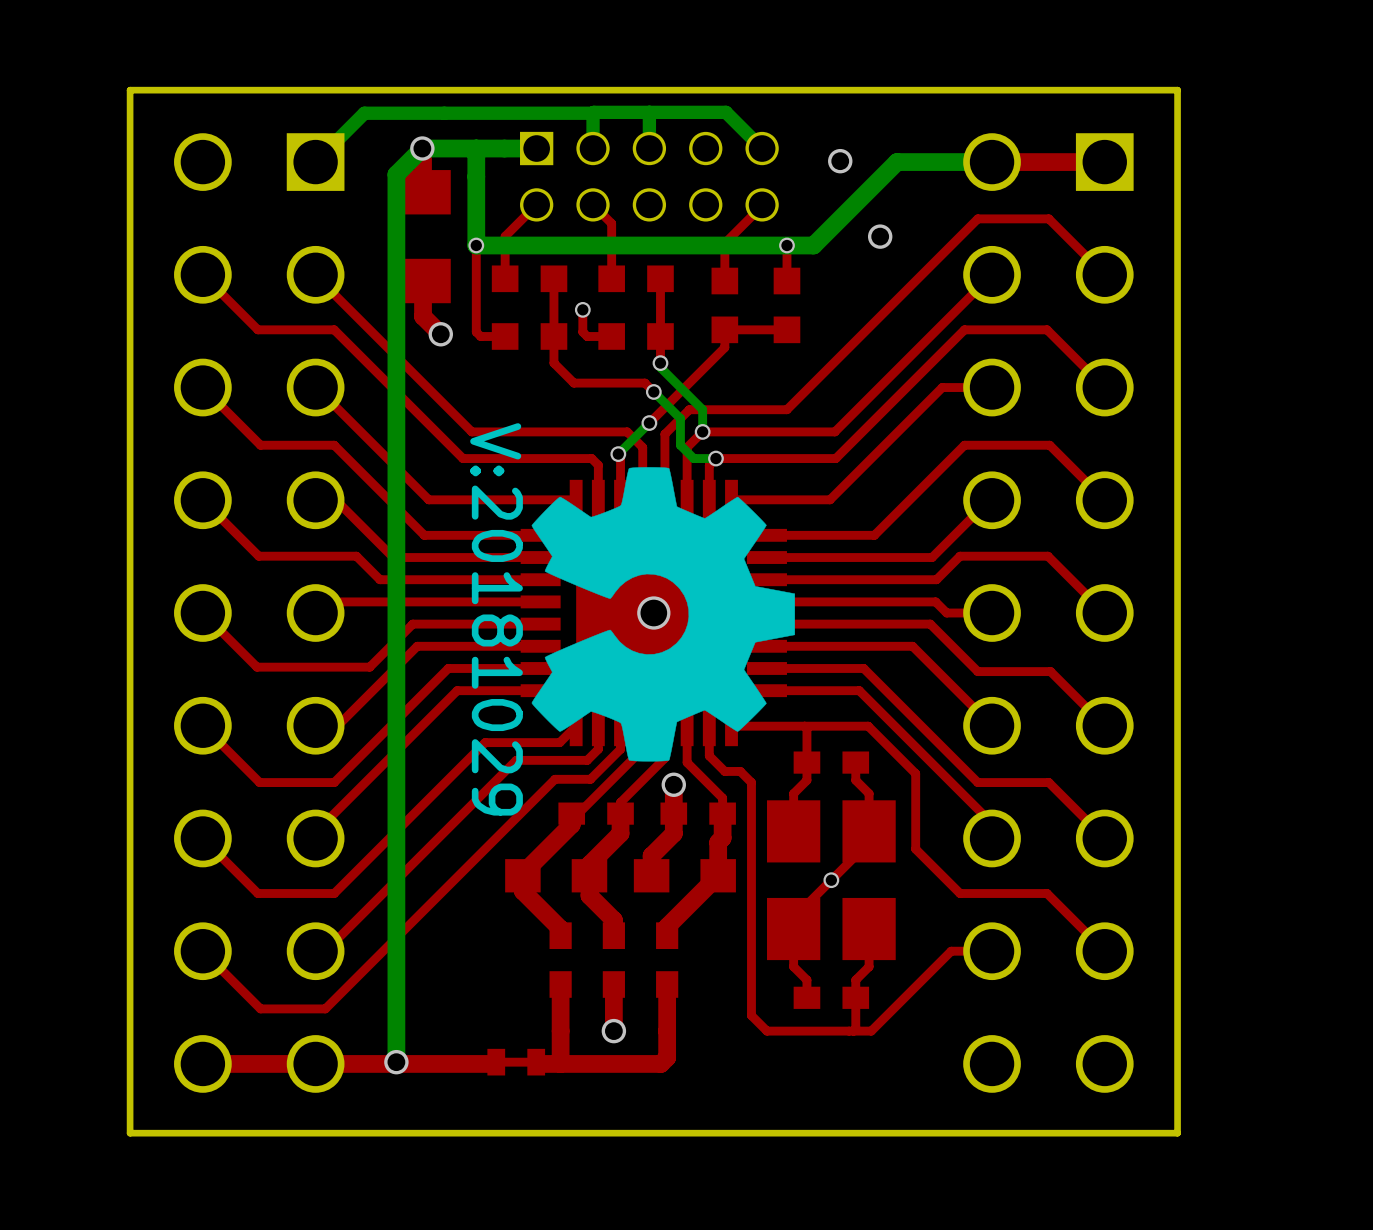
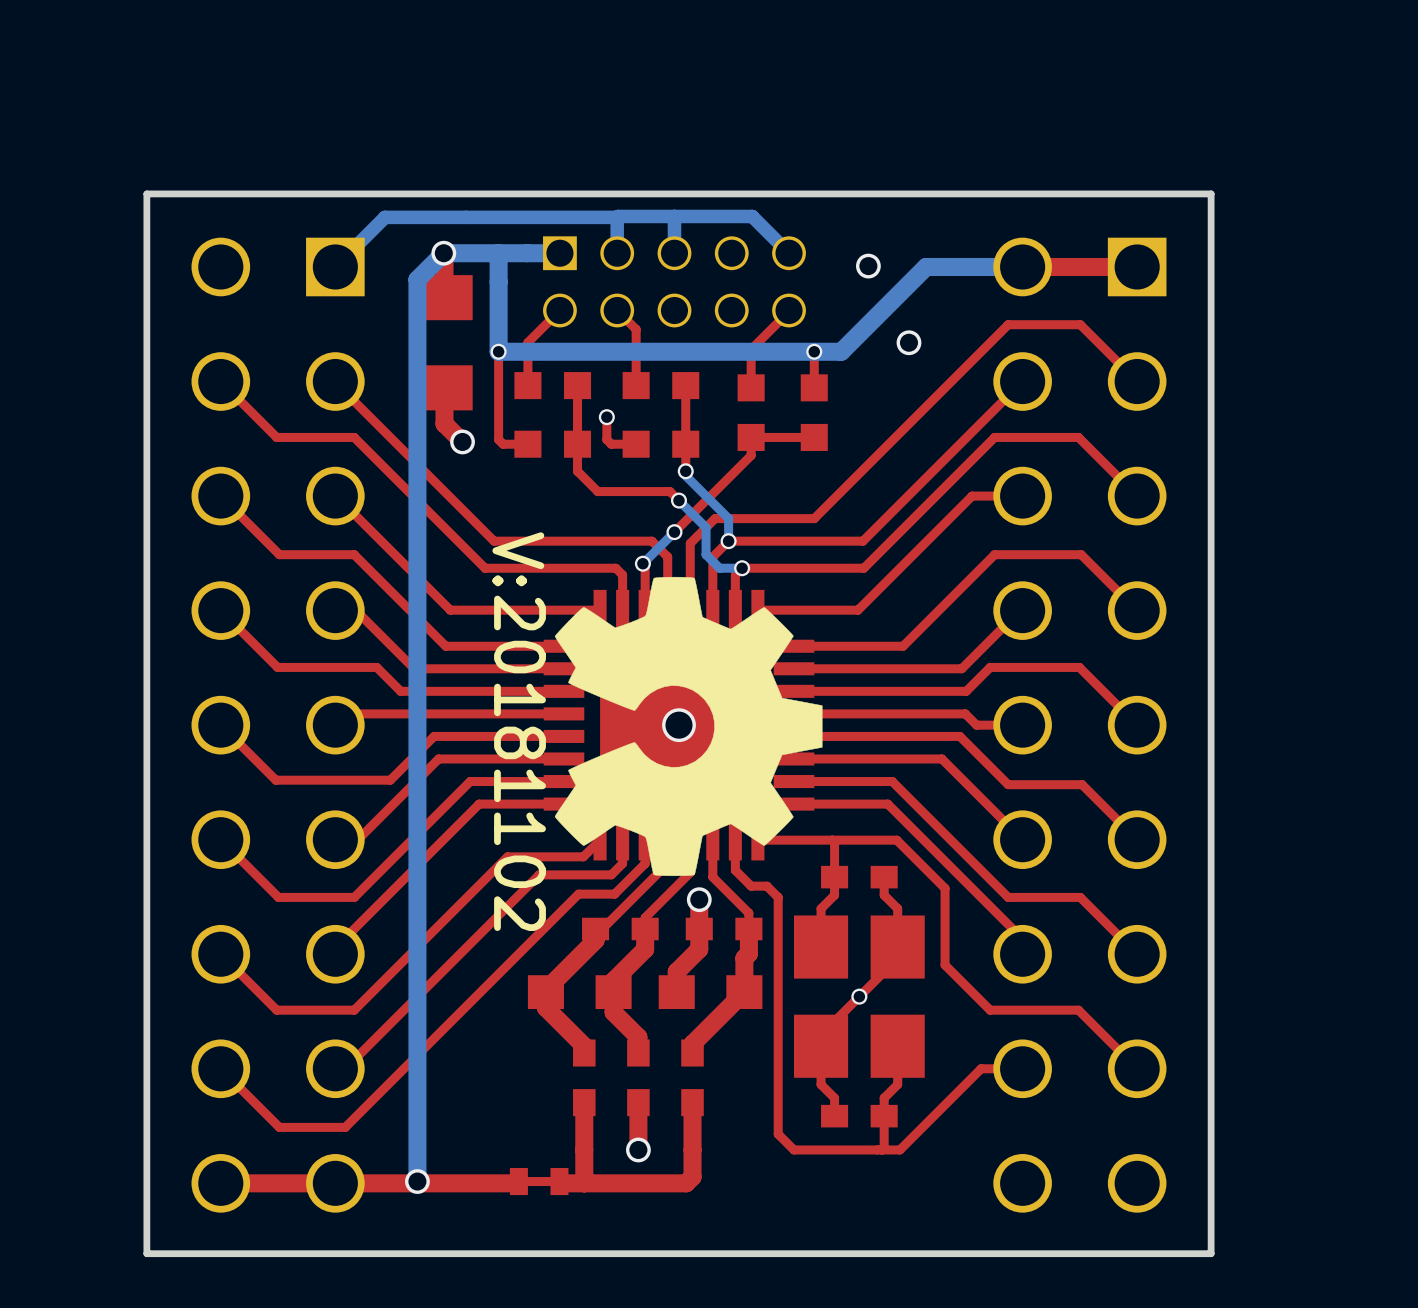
drawing shape: [470, 423, 523, 816] -> [492, 532, 546, 931]

